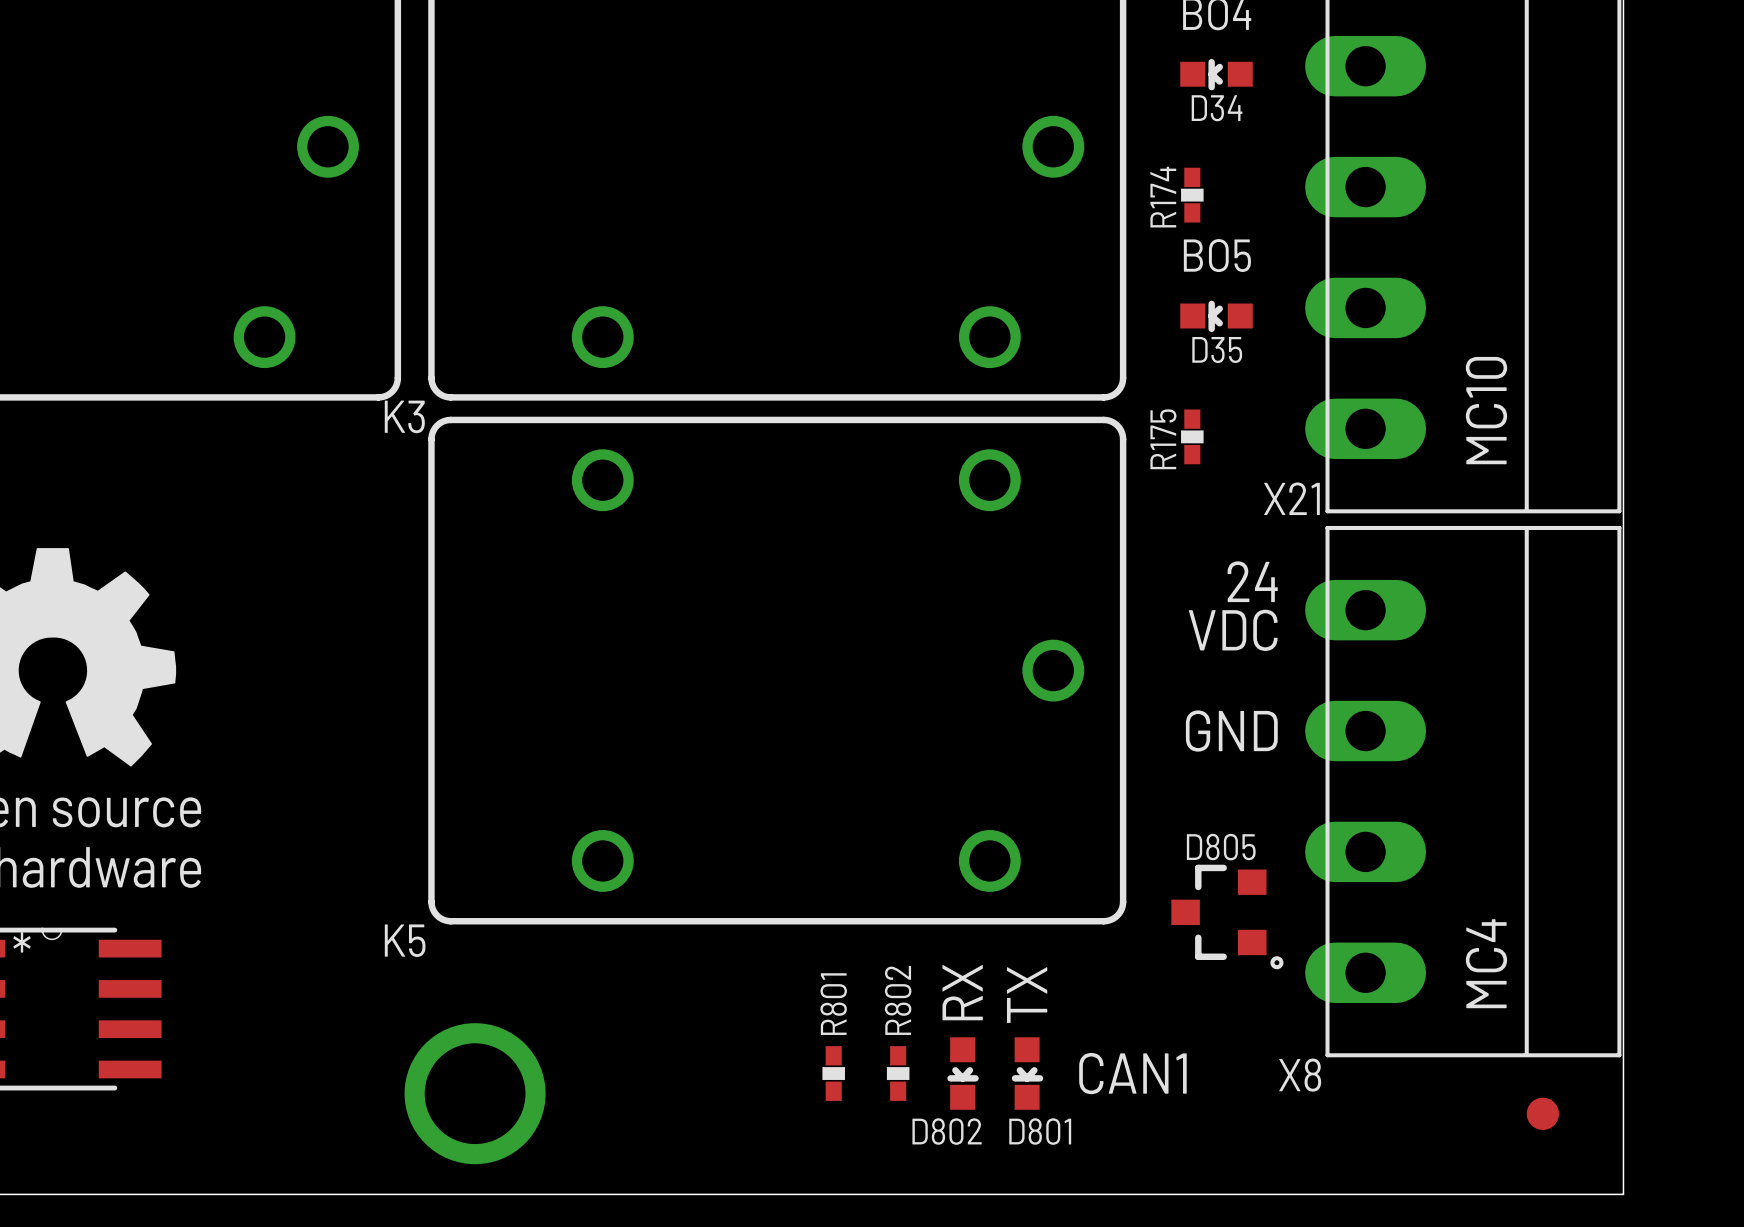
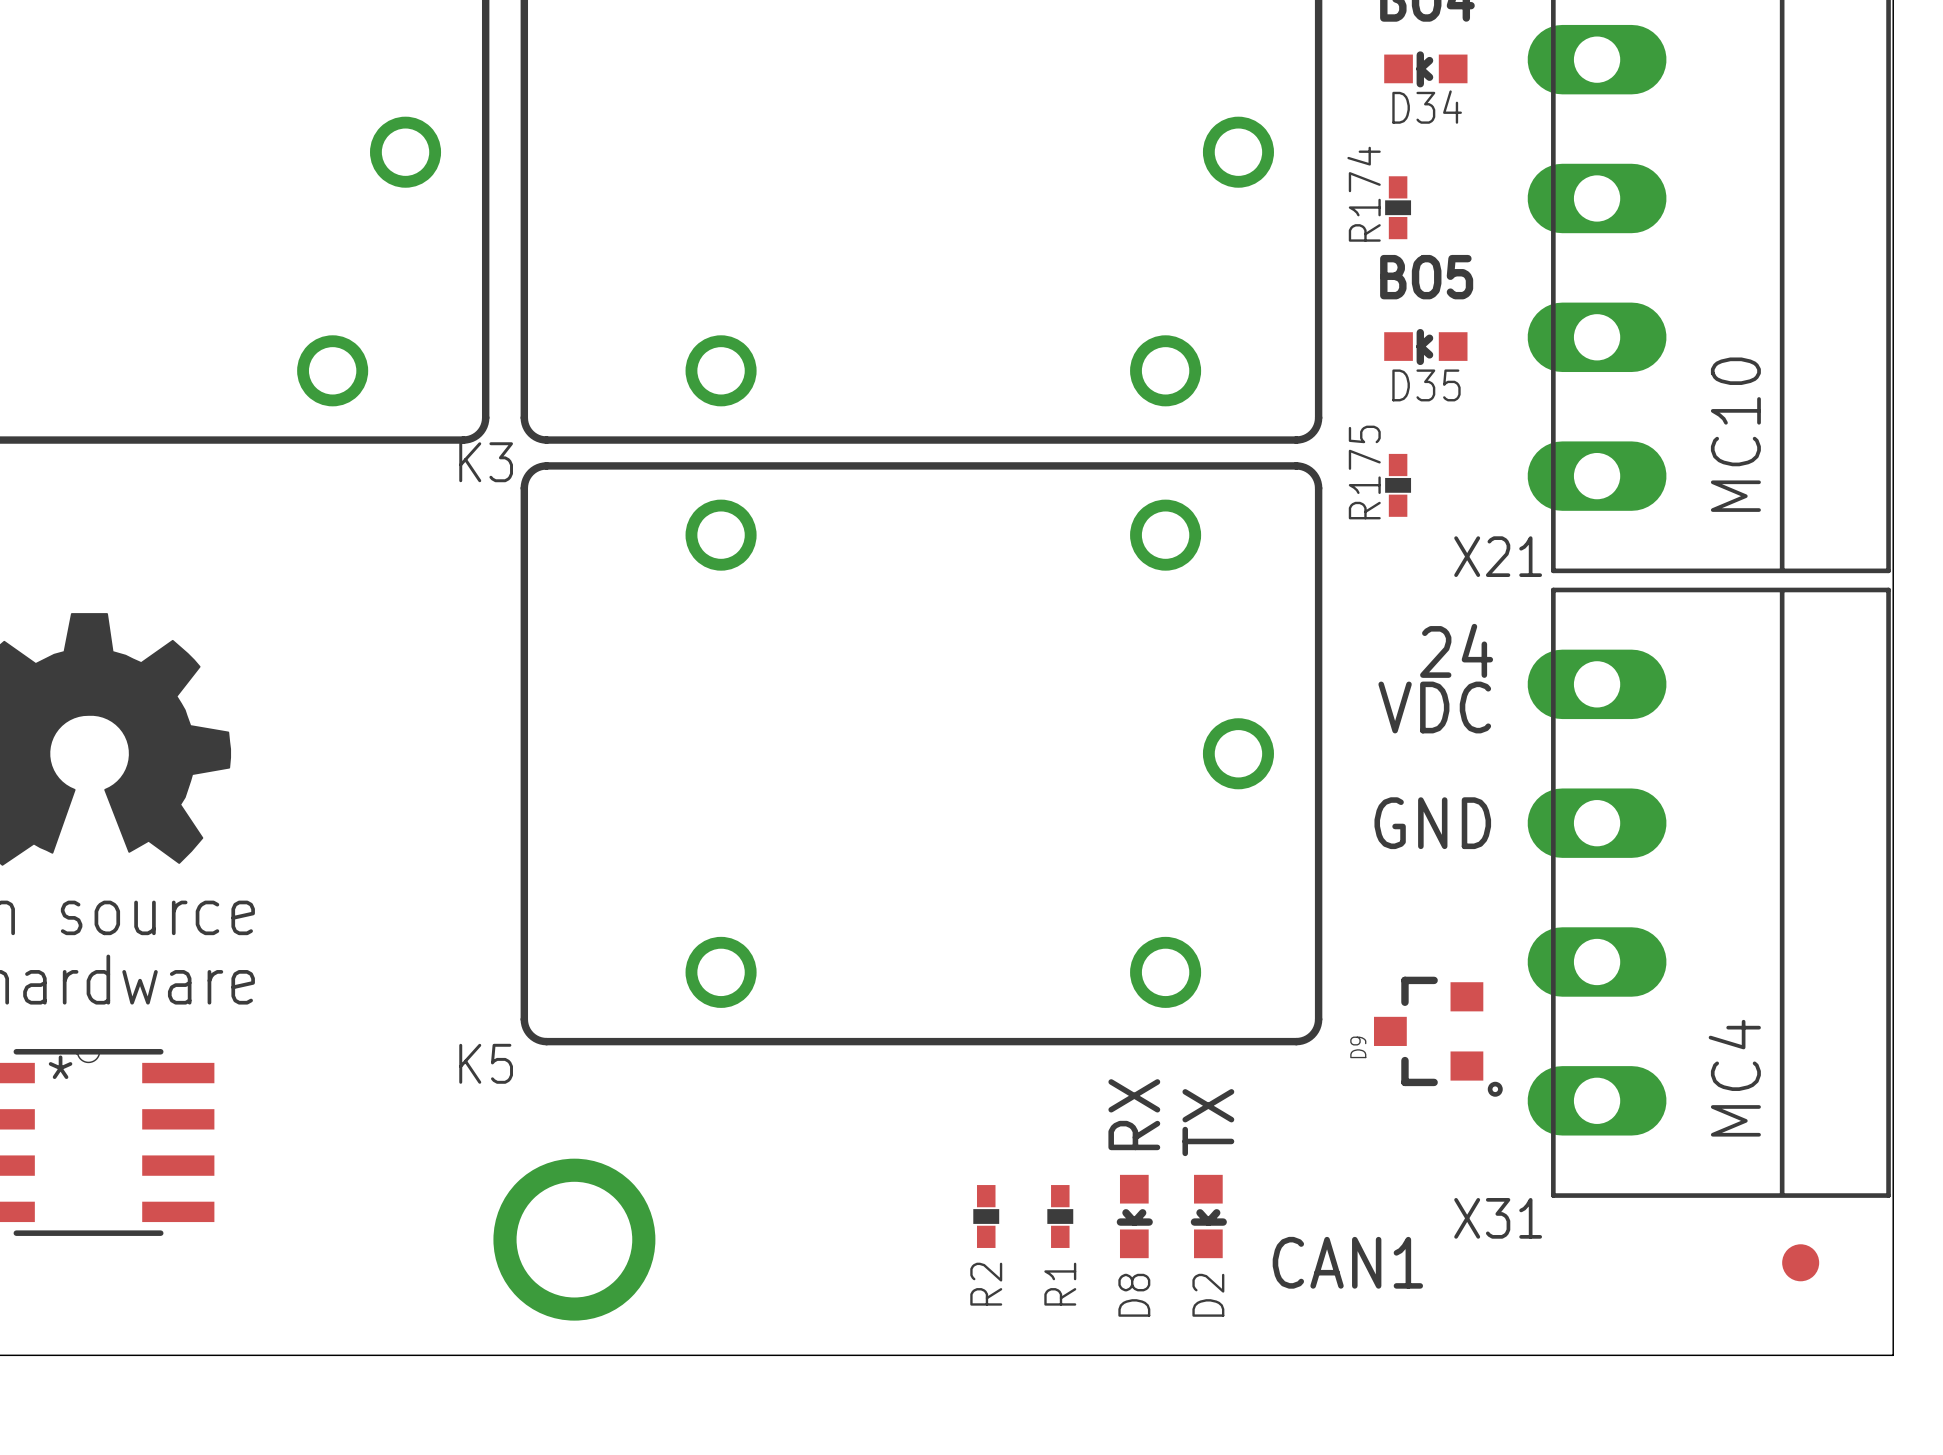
D805 name: D805 (1221, 847) -> D9 (1358, 1047)
R802 name: R802 (898, 1000) -> R1 (1060, 1284)
R801 name: R801 (833, 1004) -> R2 (986, 1284)
text position: CAN1 (1132, 1073) -> CAN1 (1347, 1262)
X8 name: X8 (1300, 1075) -> X31 (1498, 1218)
D802 name: D802 (947, 1131) -> D8 (1134, 1295)
D801 name: D801 (1040, 1131) -> D2 (1208, 1295)

